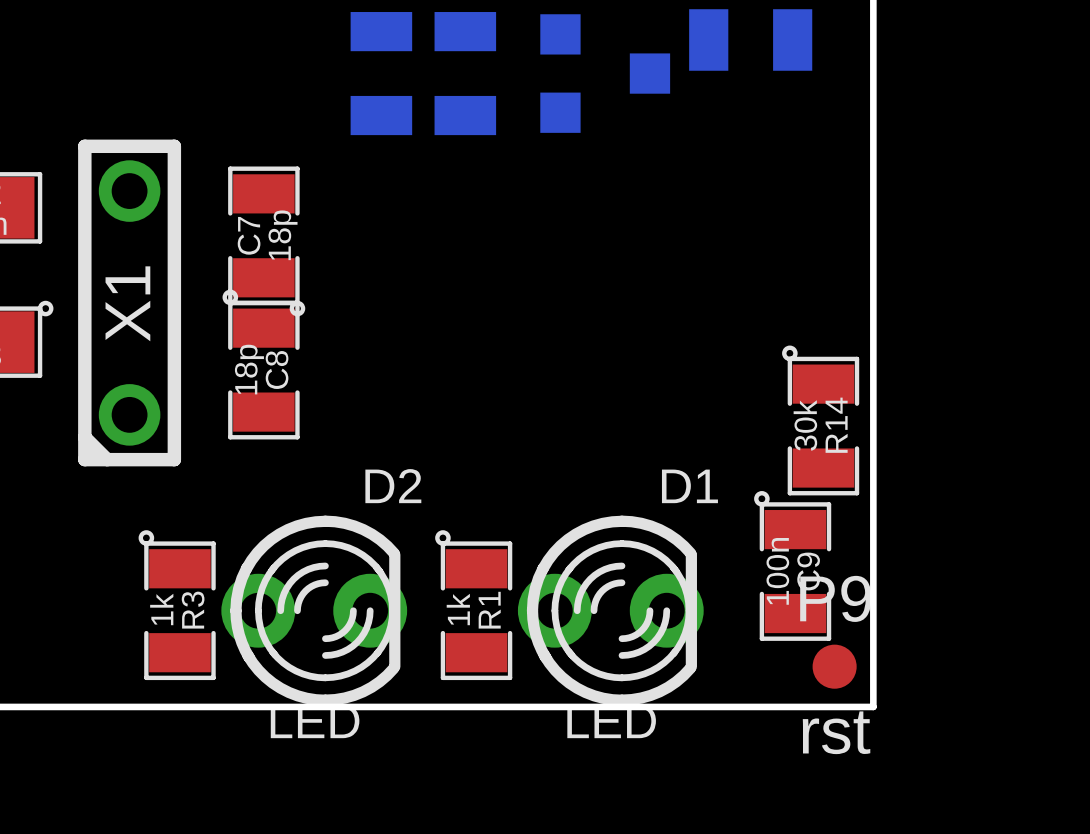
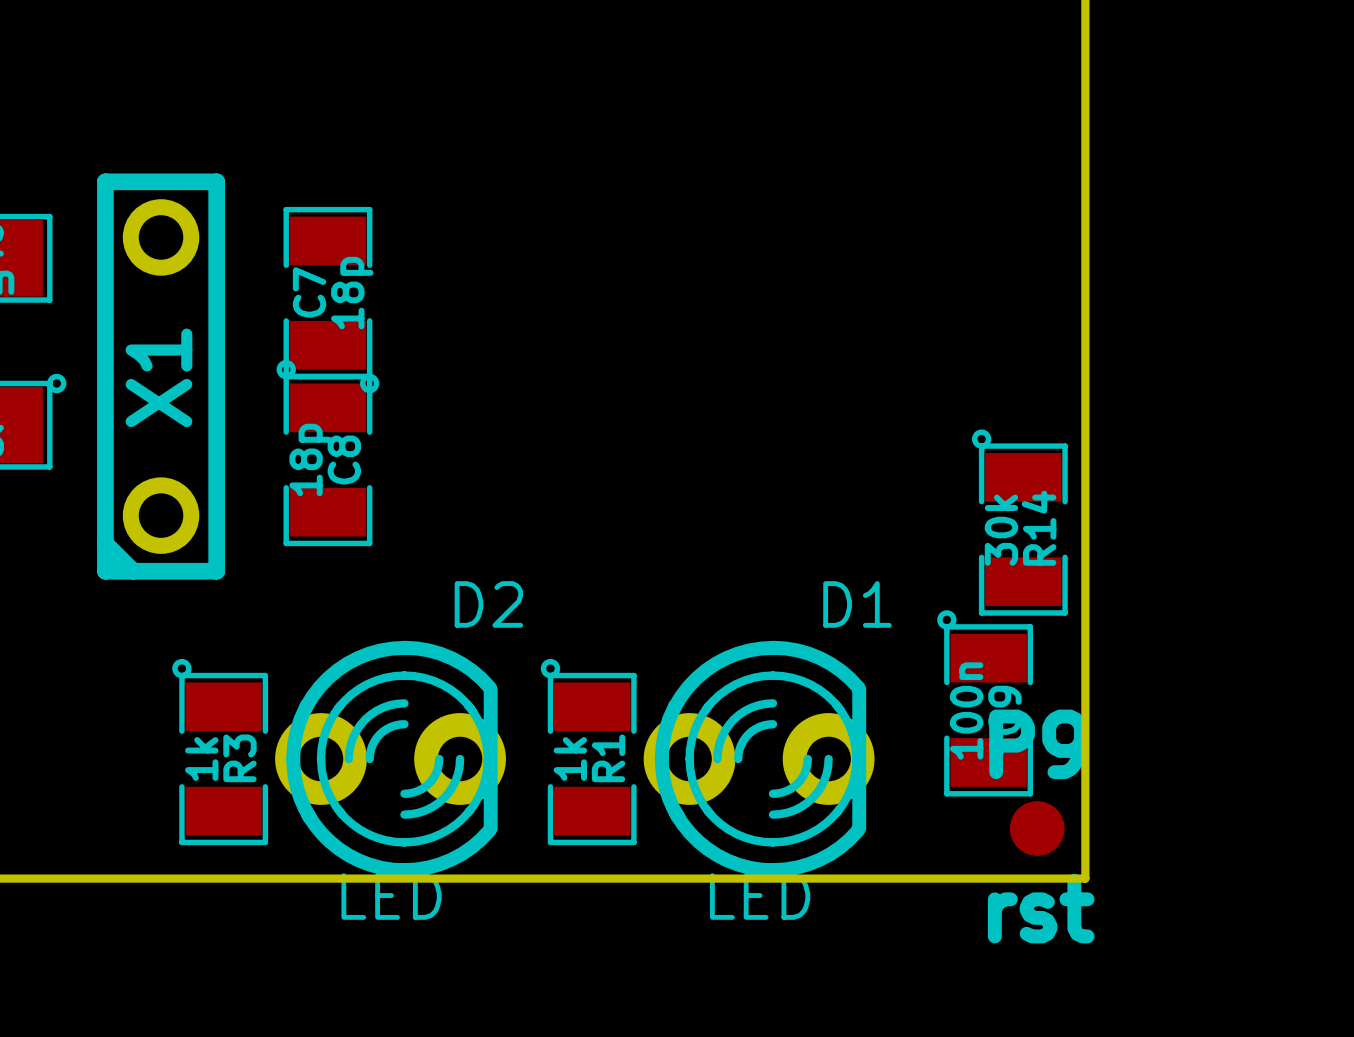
part: (750, 39) -> none
part: (381, 73) -> none
part: (465, 73) -> none
part: (605, 73) -> none

